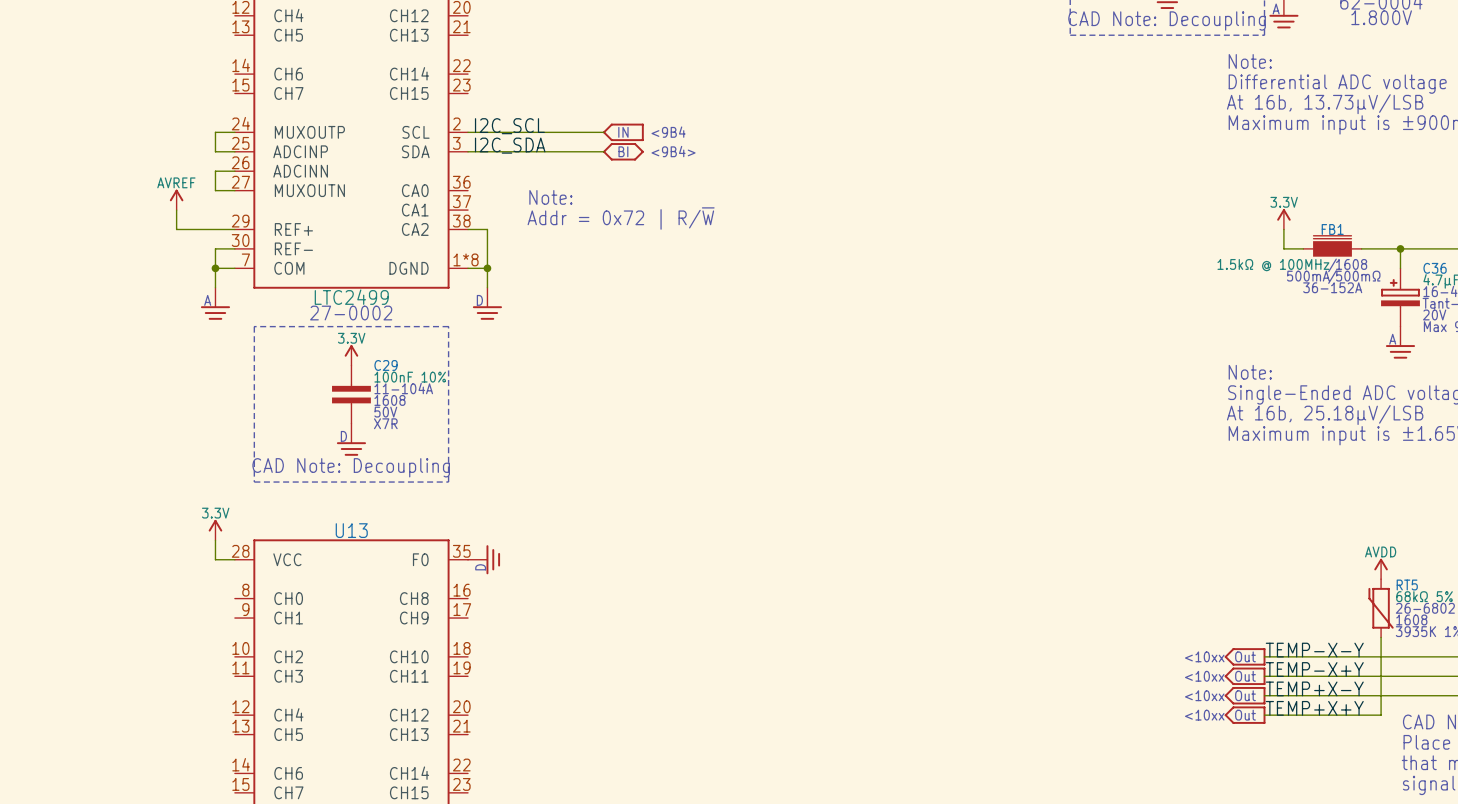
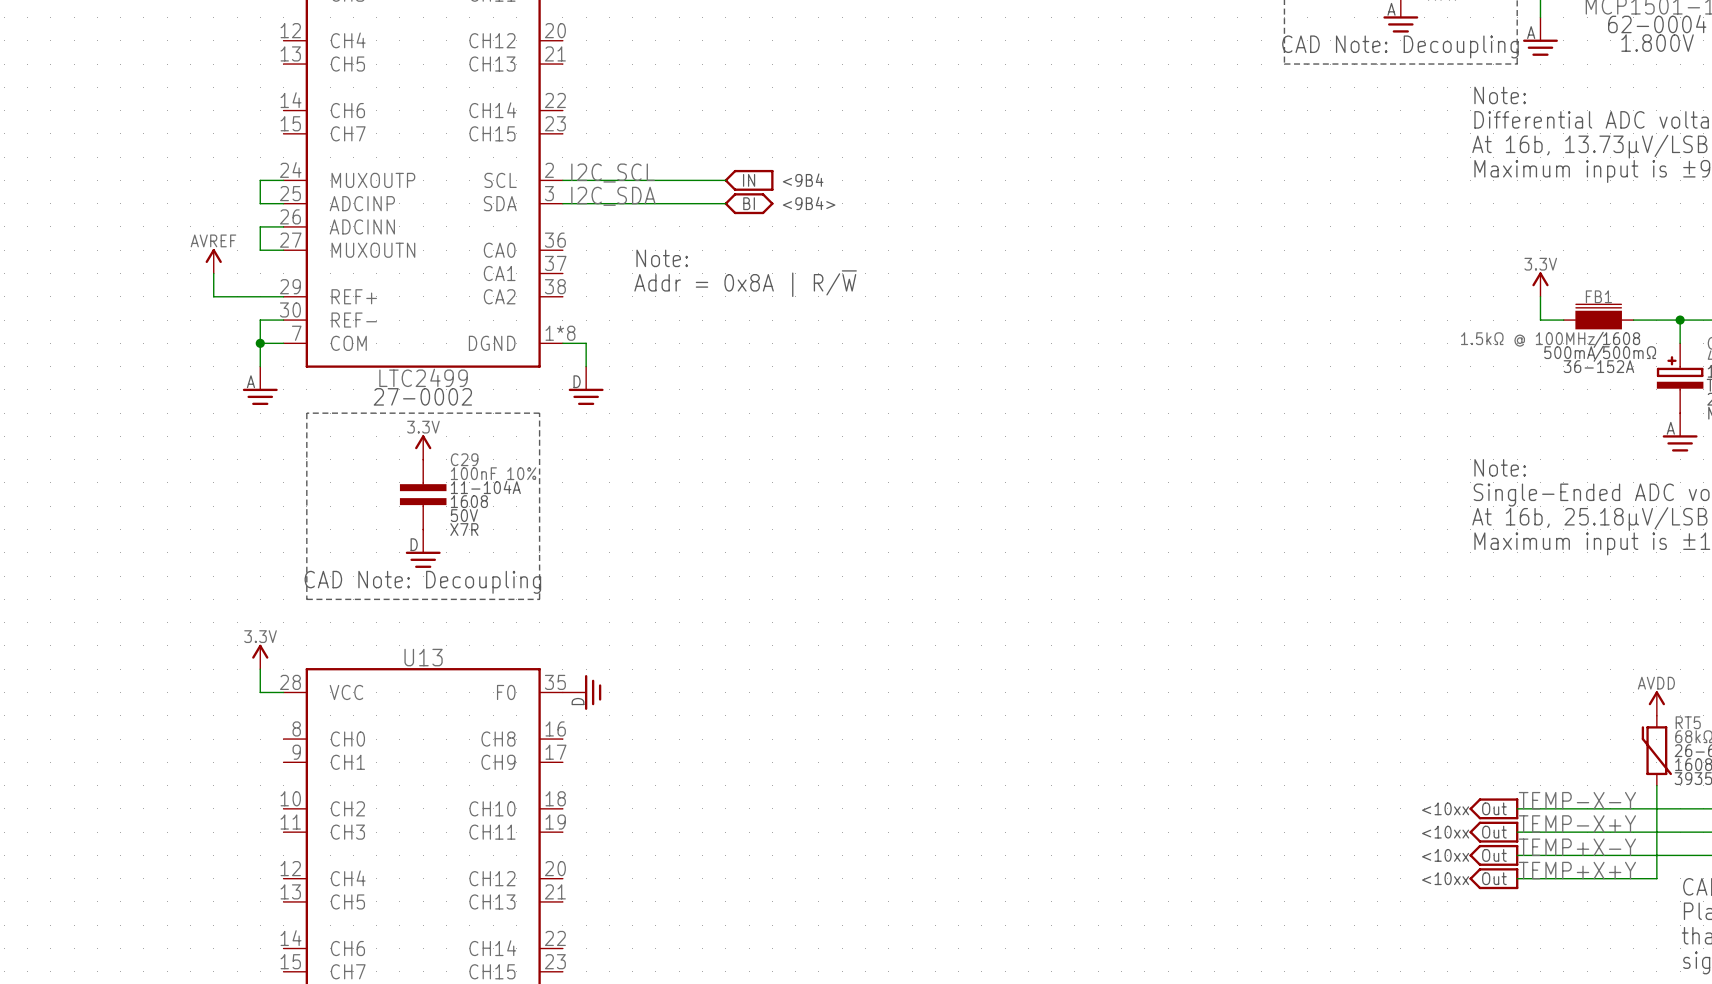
text: Addr = 0x72 | R/~{W} (621, 218) -> Addr = 0x8A | R/~{W} (745, 283)
wire: (468, 229) (487, 229) (487, 268) -> none
junction: (487, 268) -> none

